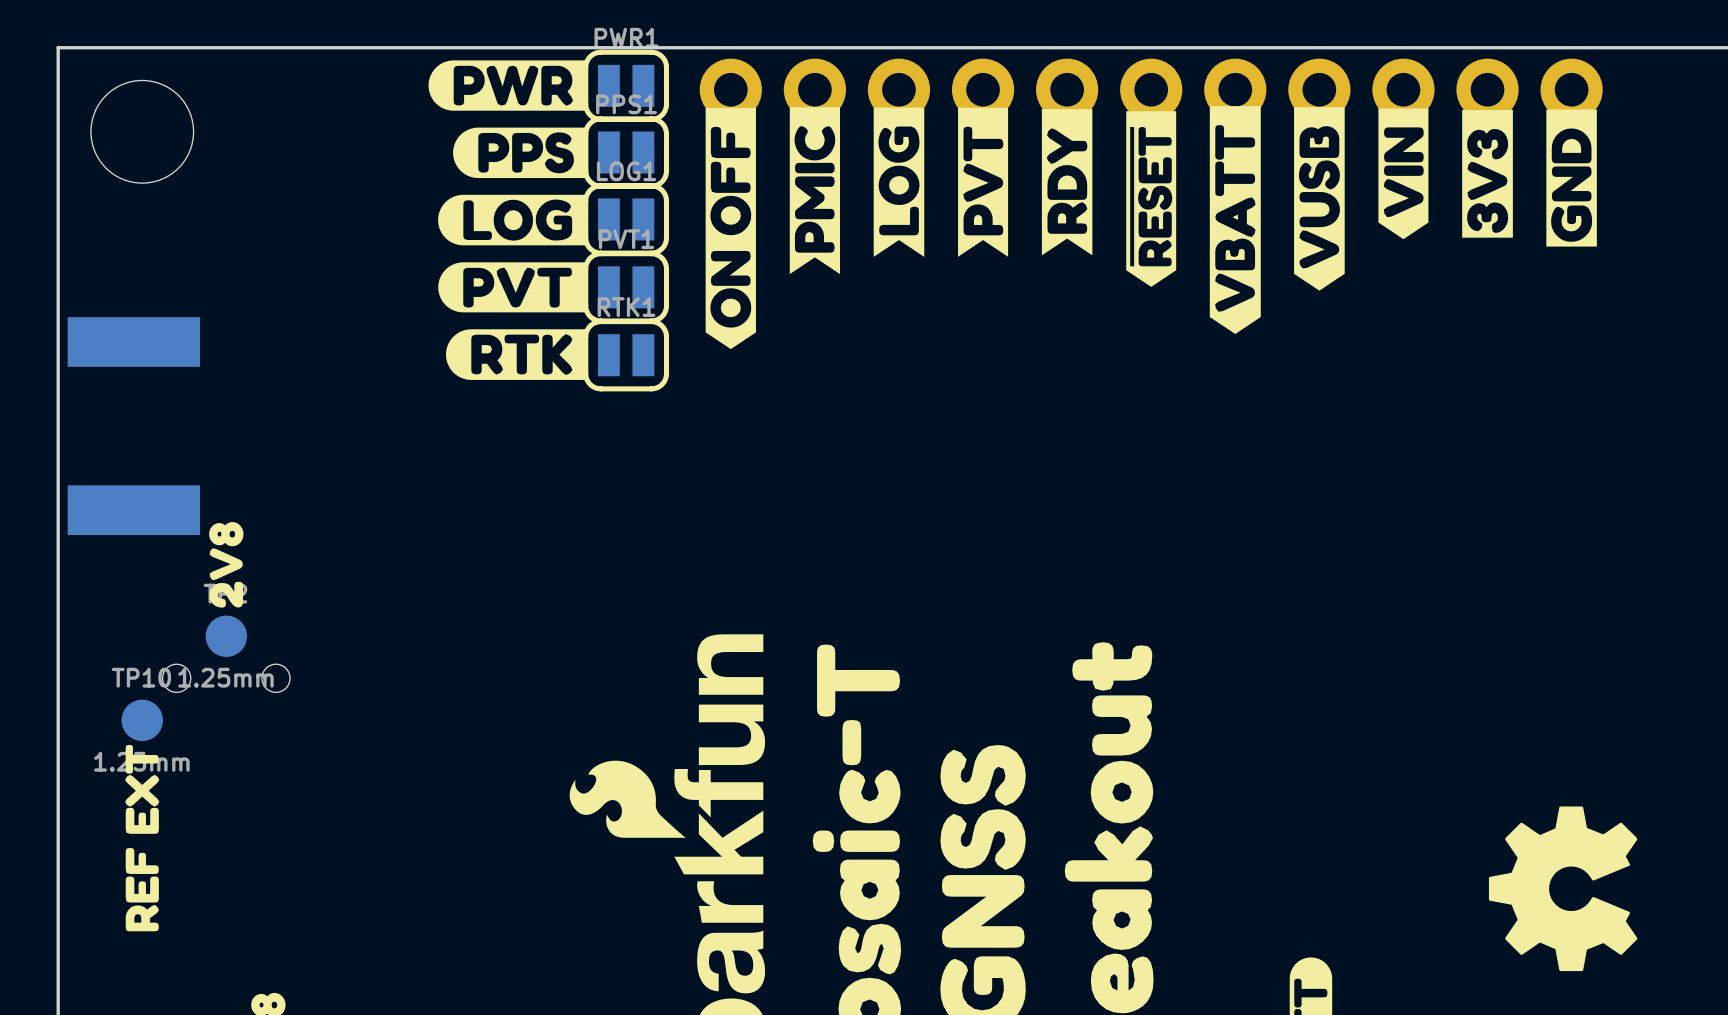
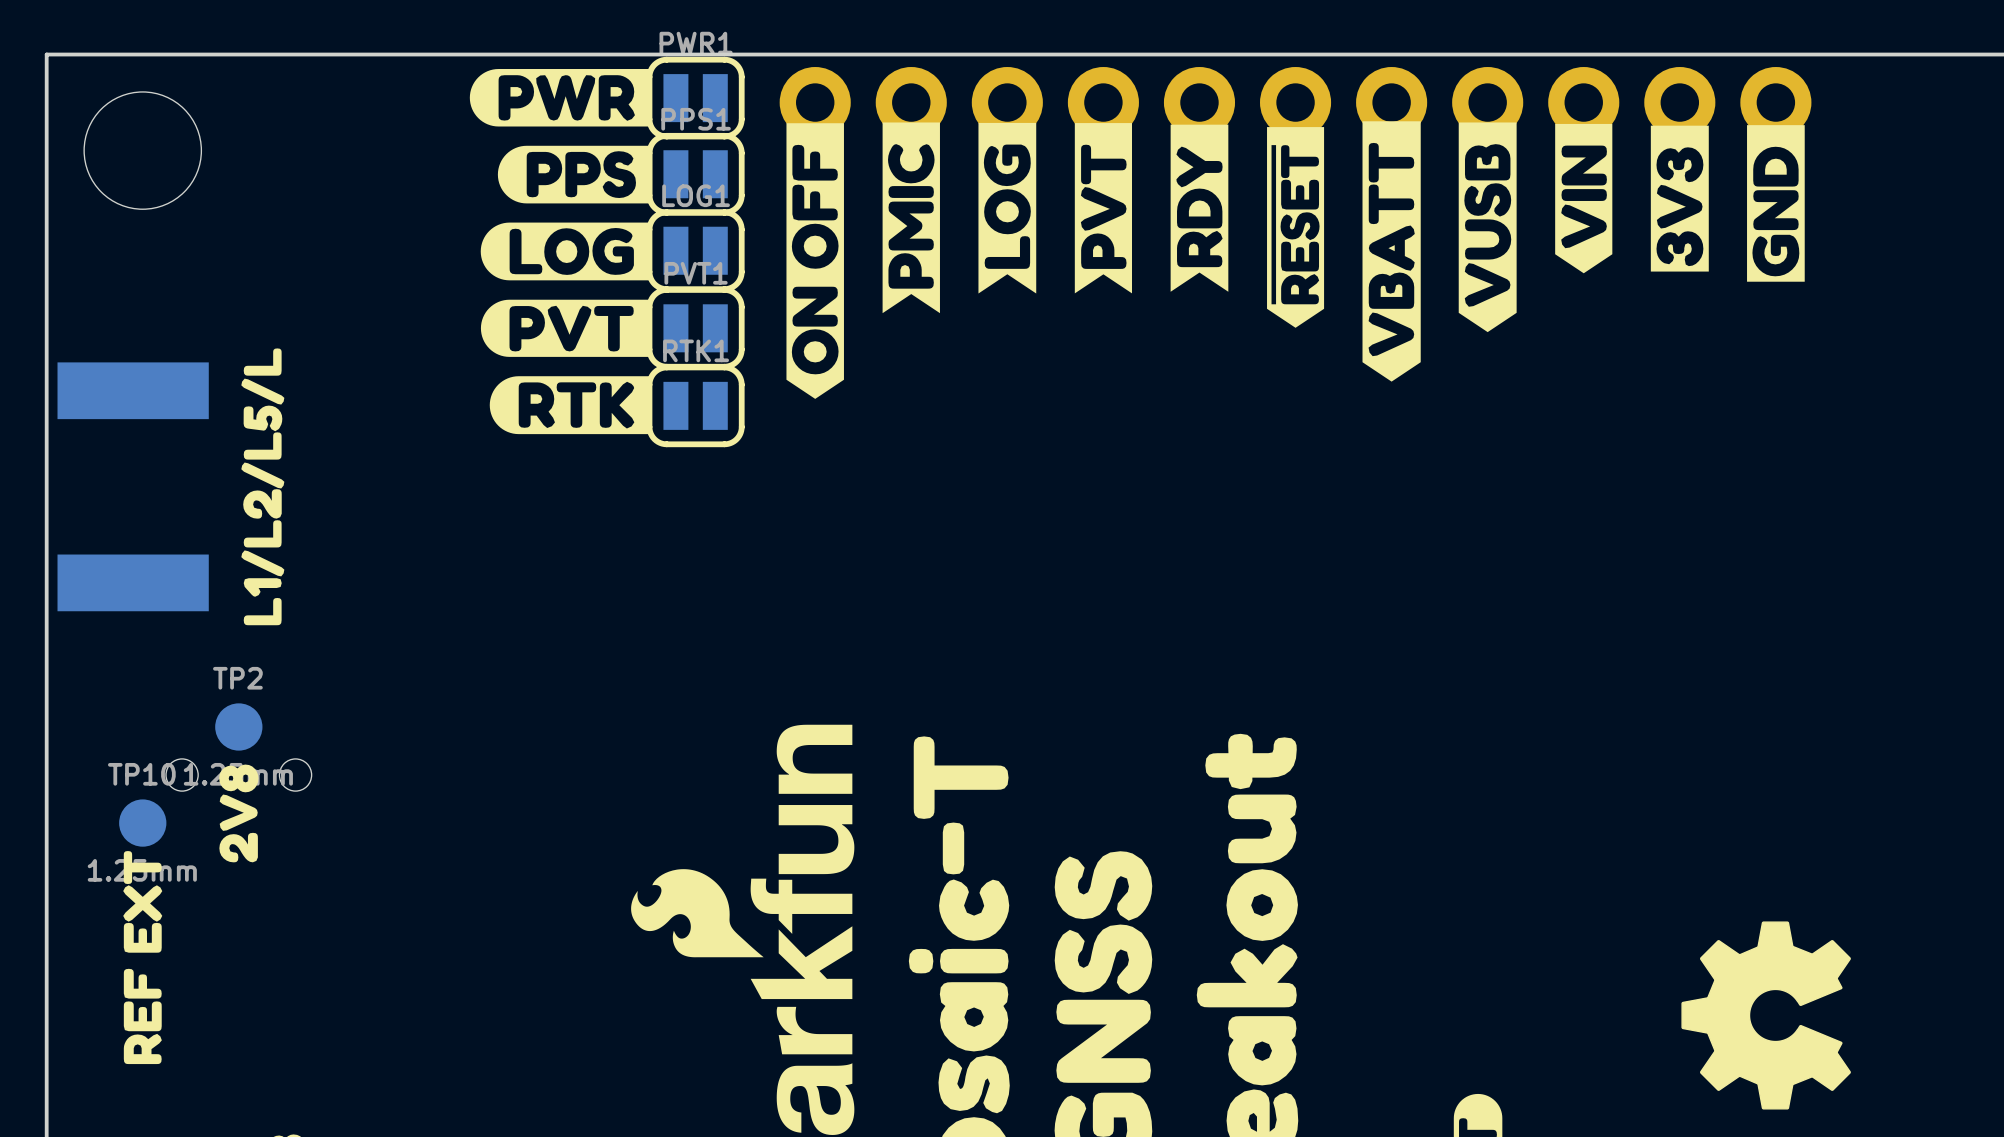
drawing: none -> [241, 348, 285, 626]
drawing position: (226, 564) -> (238, 813)

